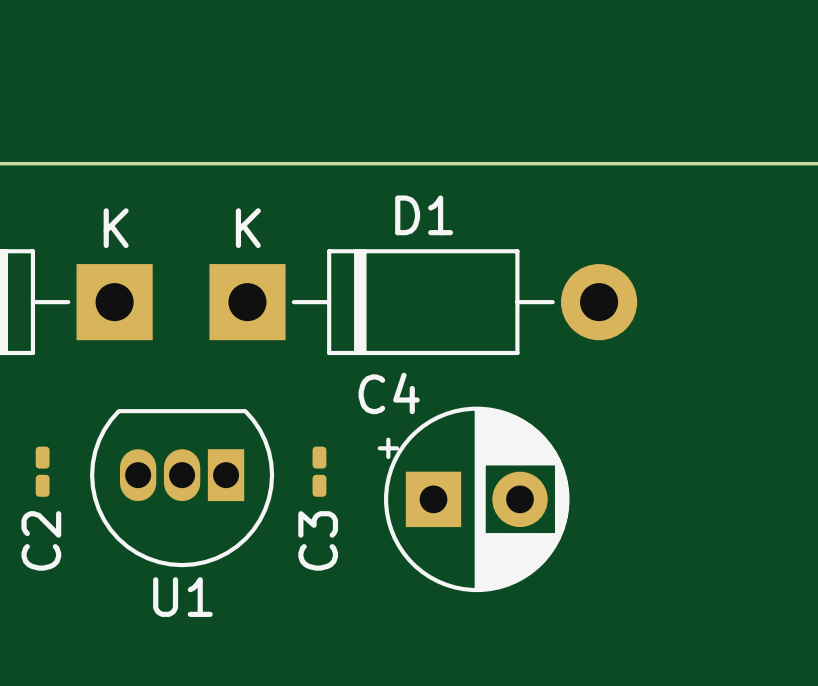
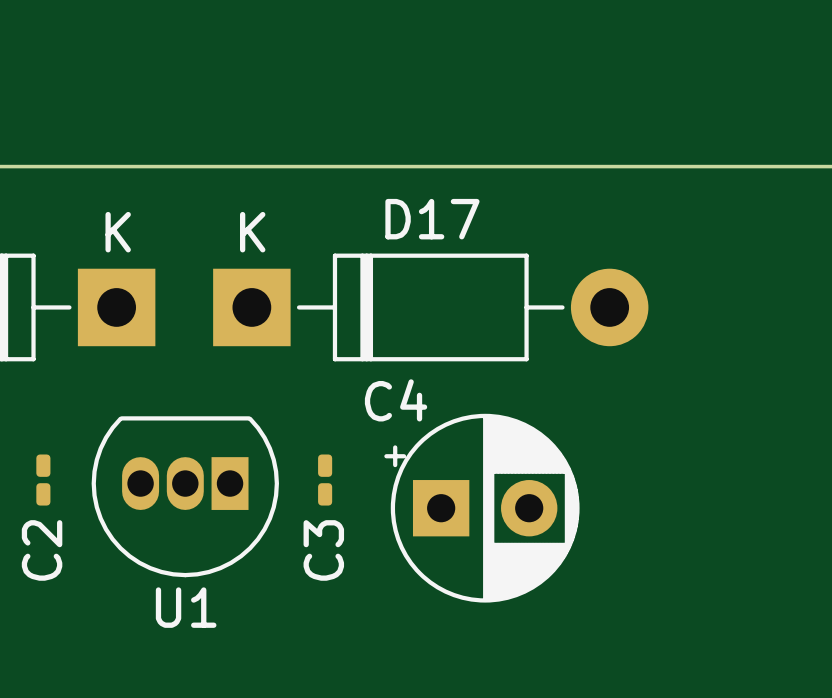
D1 name: D1 (424, 215) -> D17 (432, 219)

